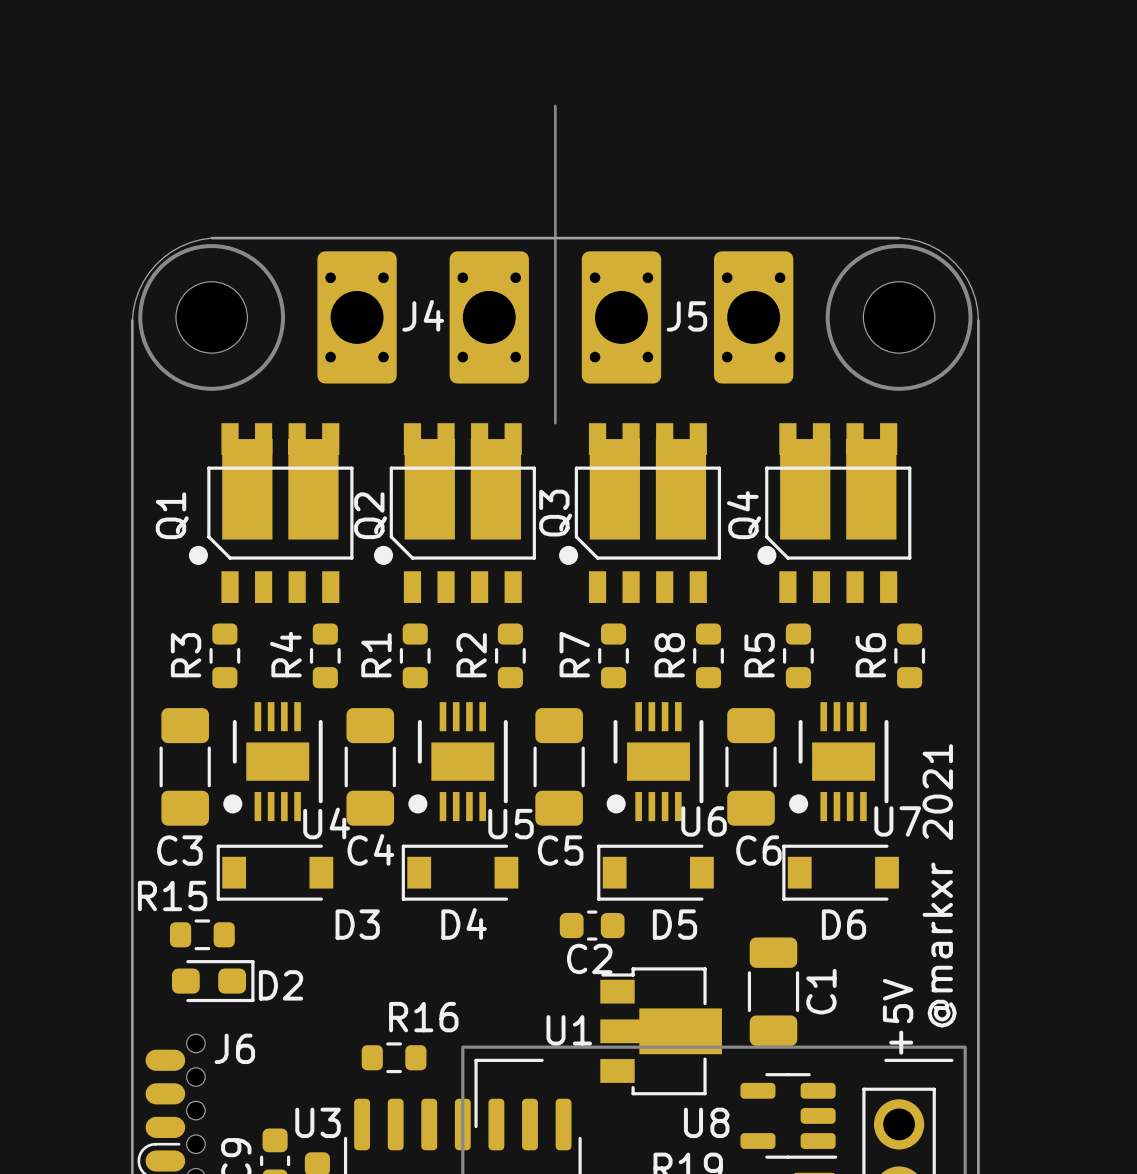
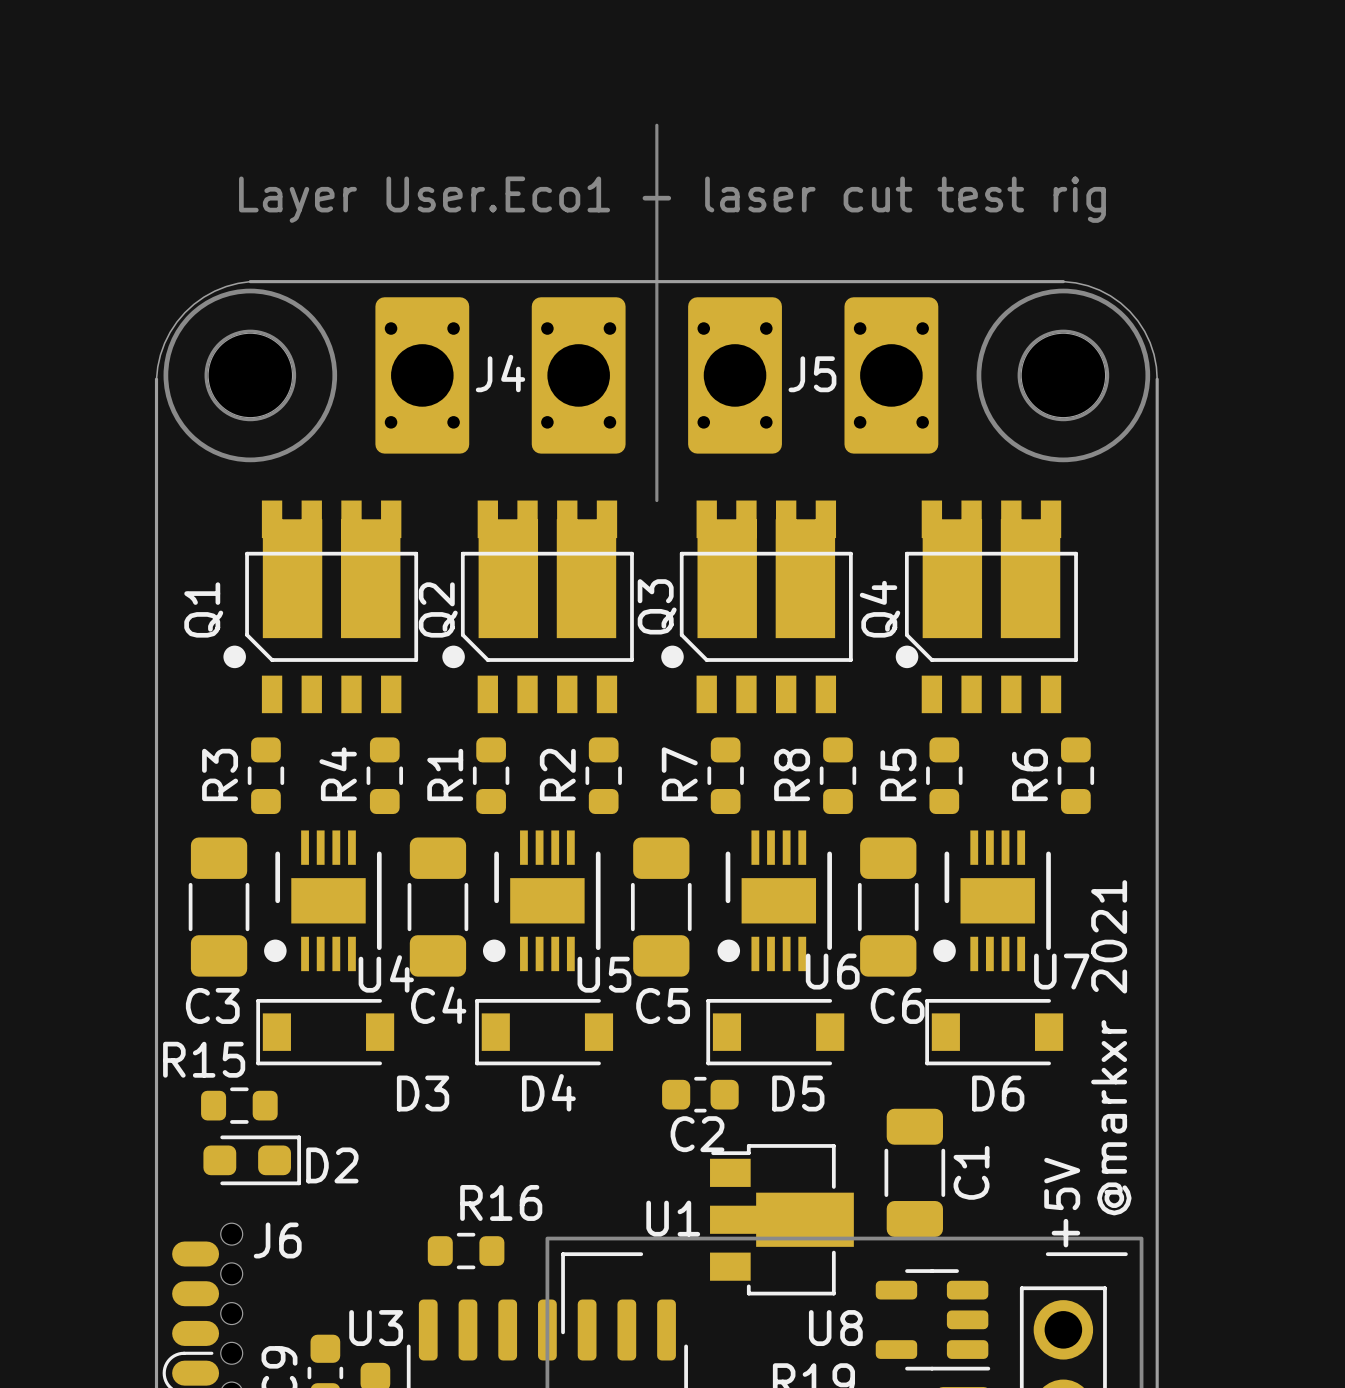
text: none -> Layer User.Eco1 - laser cut test rig (672, 199)
drawing: none -> [204, 329, 297, 422]
drawing: none -> [1017, 329, 1110, 422]

